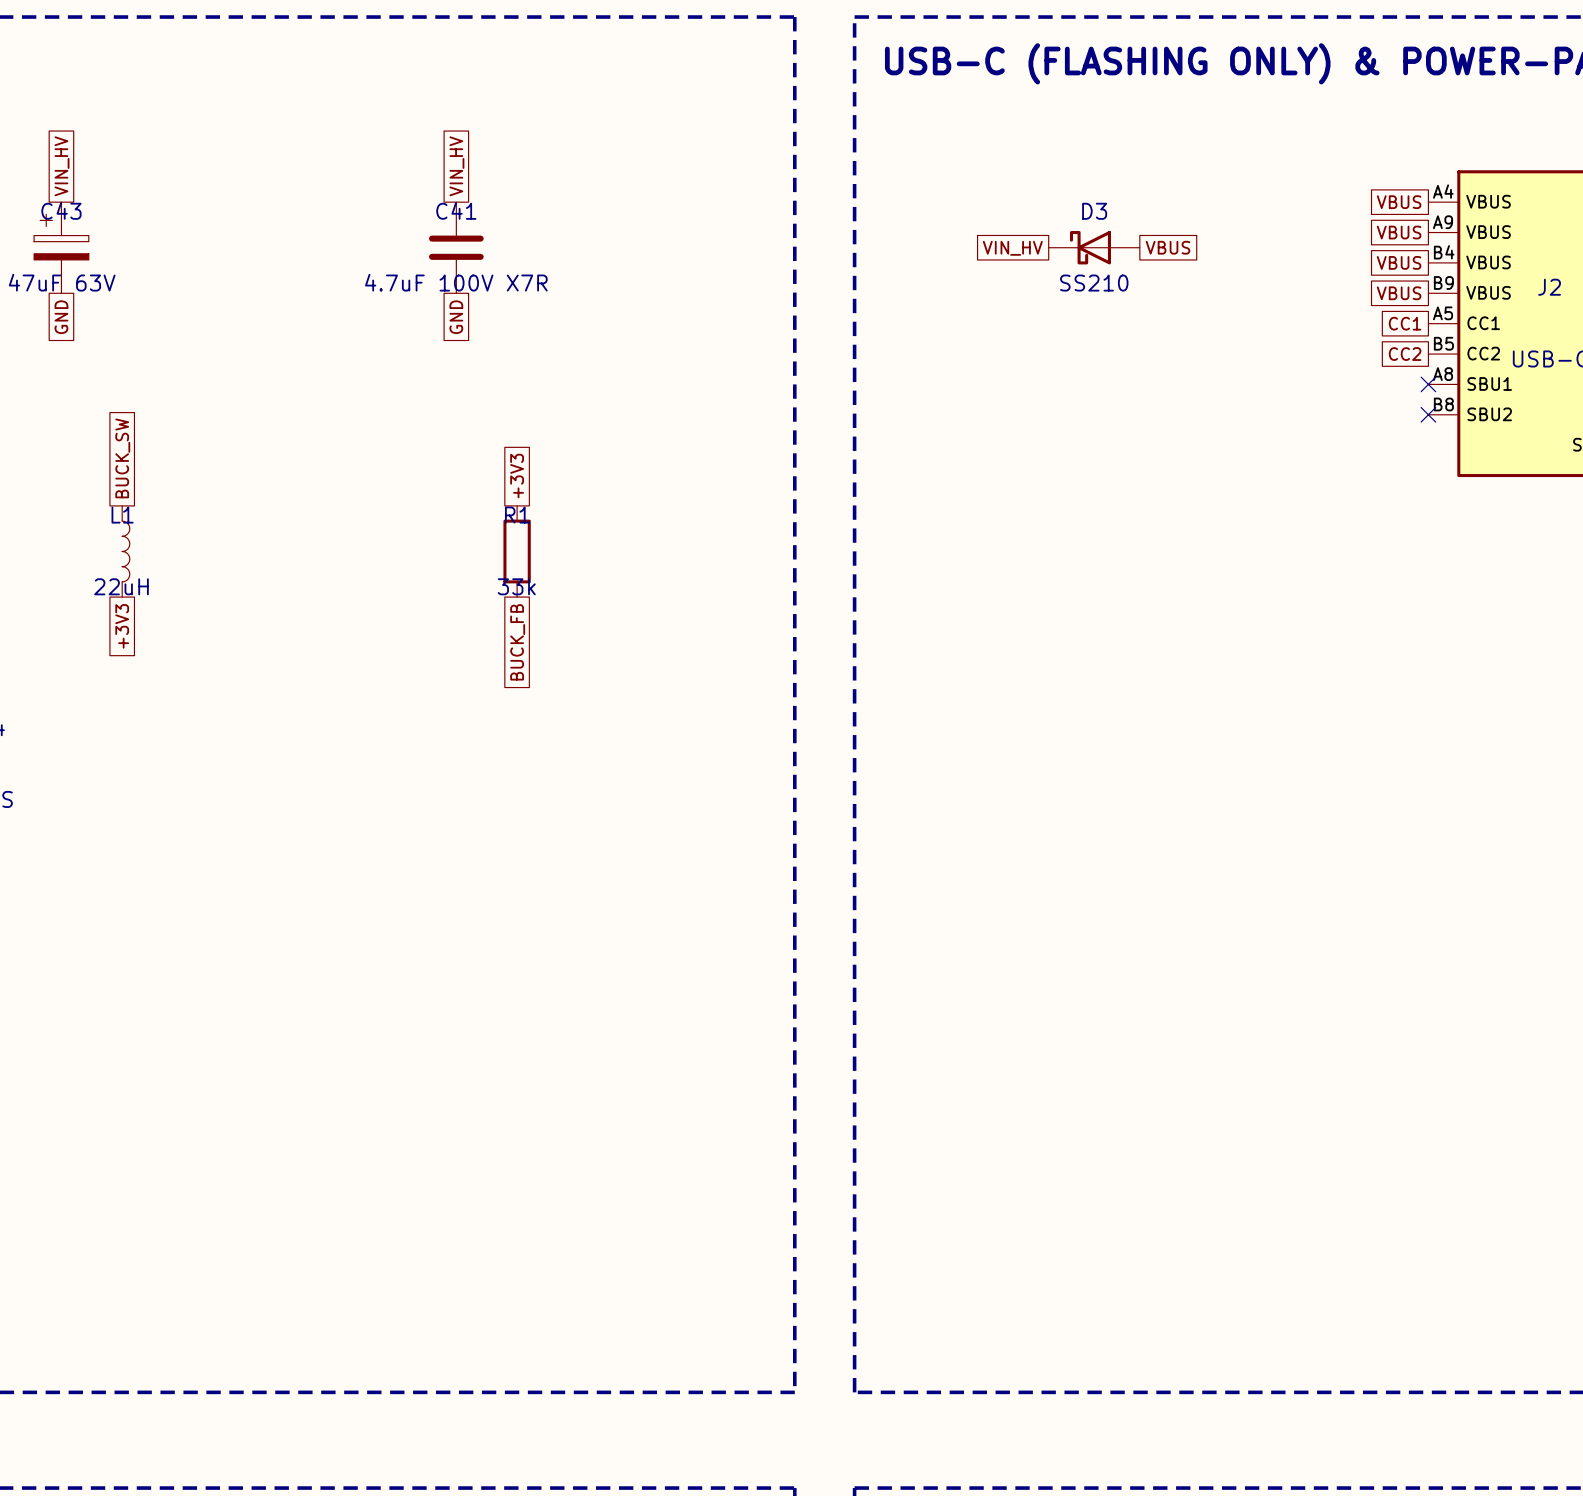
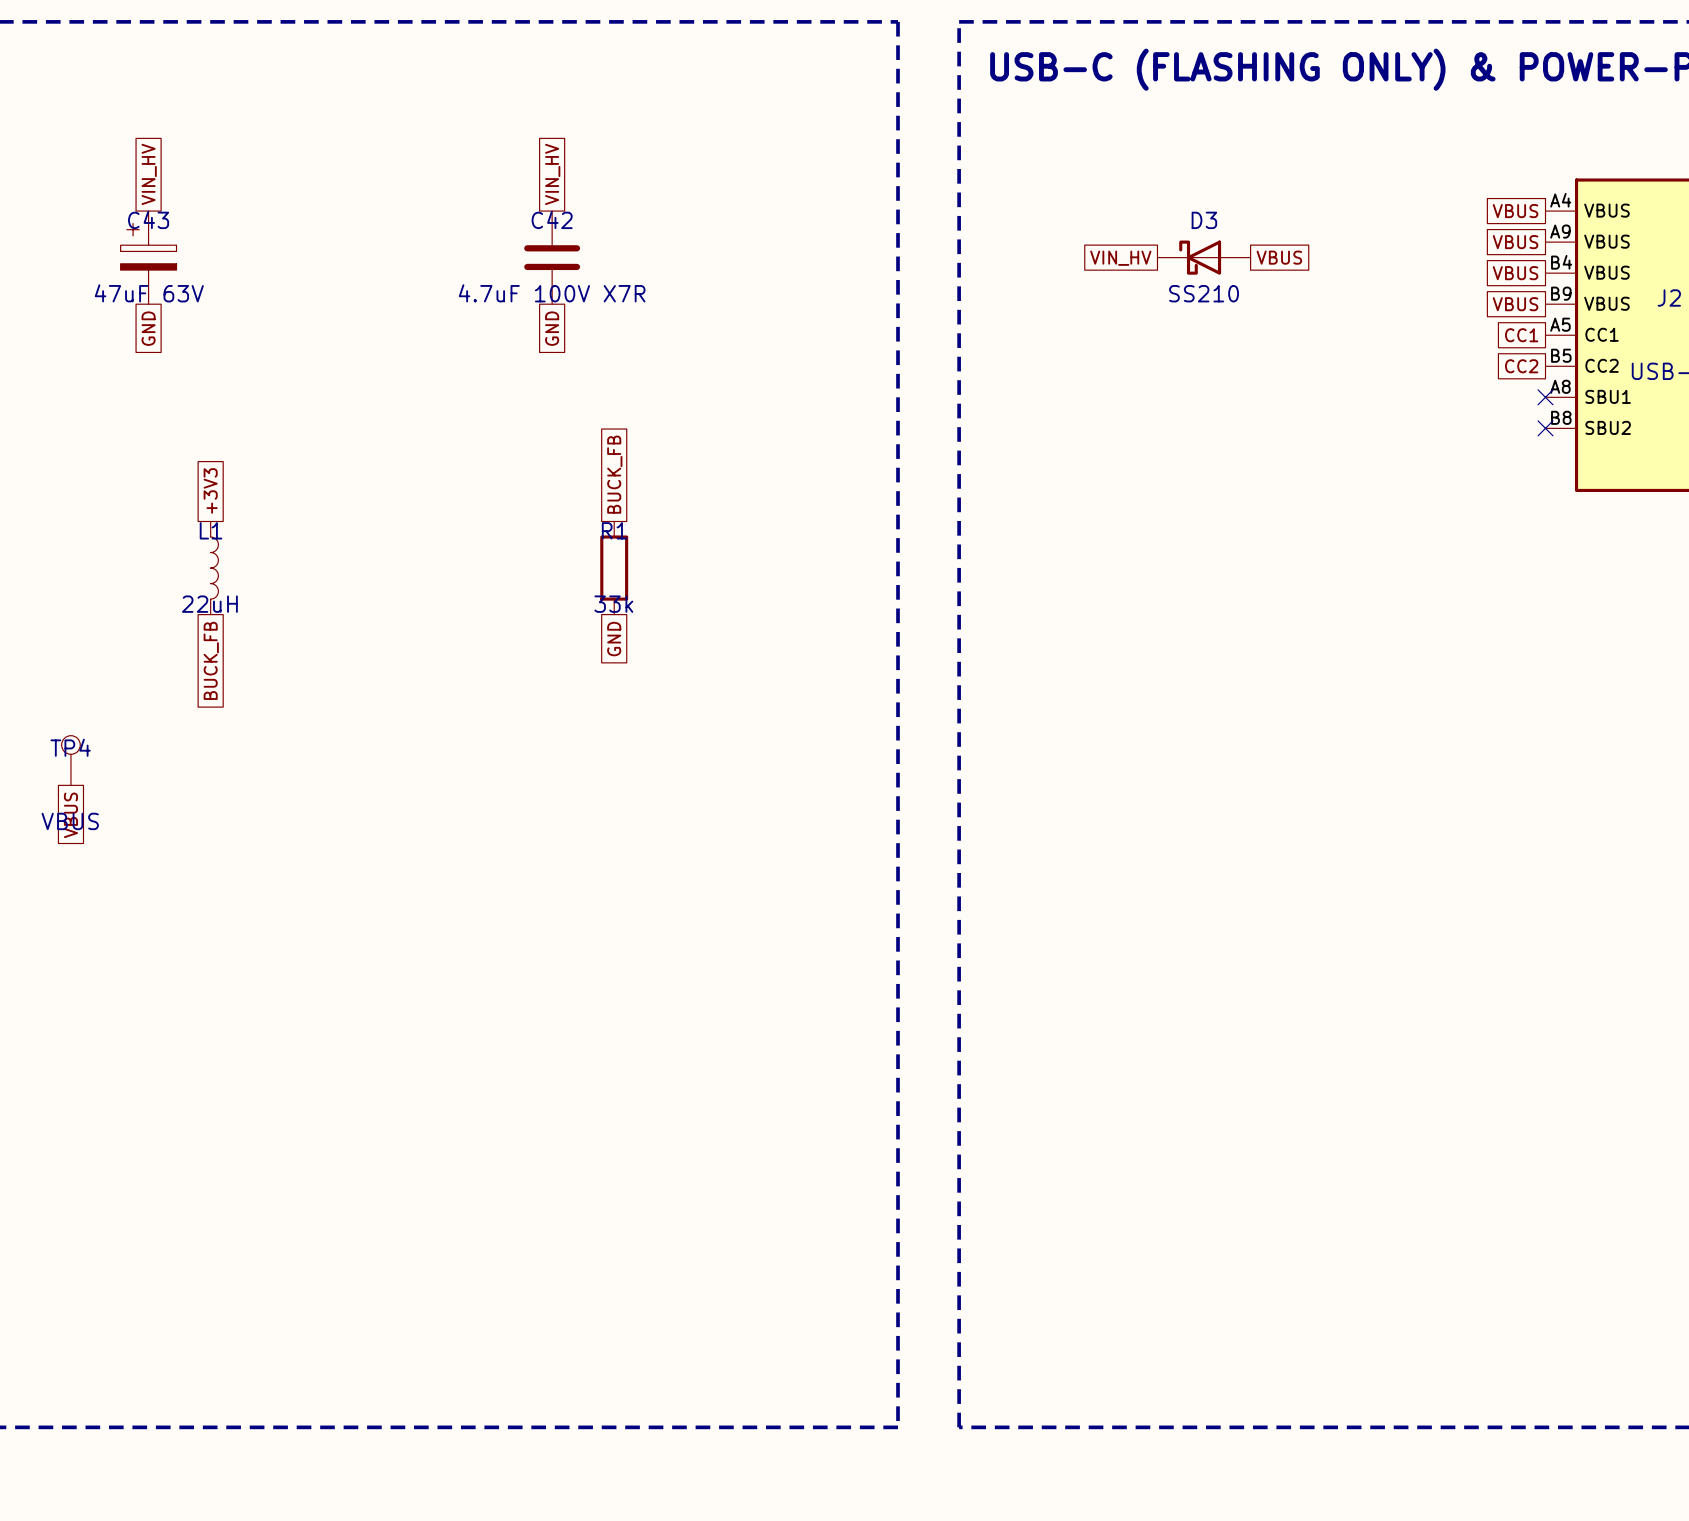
C41 name: C41 (456, 210) -> C42 (552, 220)
global label: BUCK_SW (122, 458) -> +3V3 (210, 490)
global label: +3V3 (517, 476) -> BUCK_FB (614, 474)
global label: +3V3 (122, 626) -> BUCK_FB (211, 660)
global label: BUCK_FB (517, 642) -> GND (614, 639)

